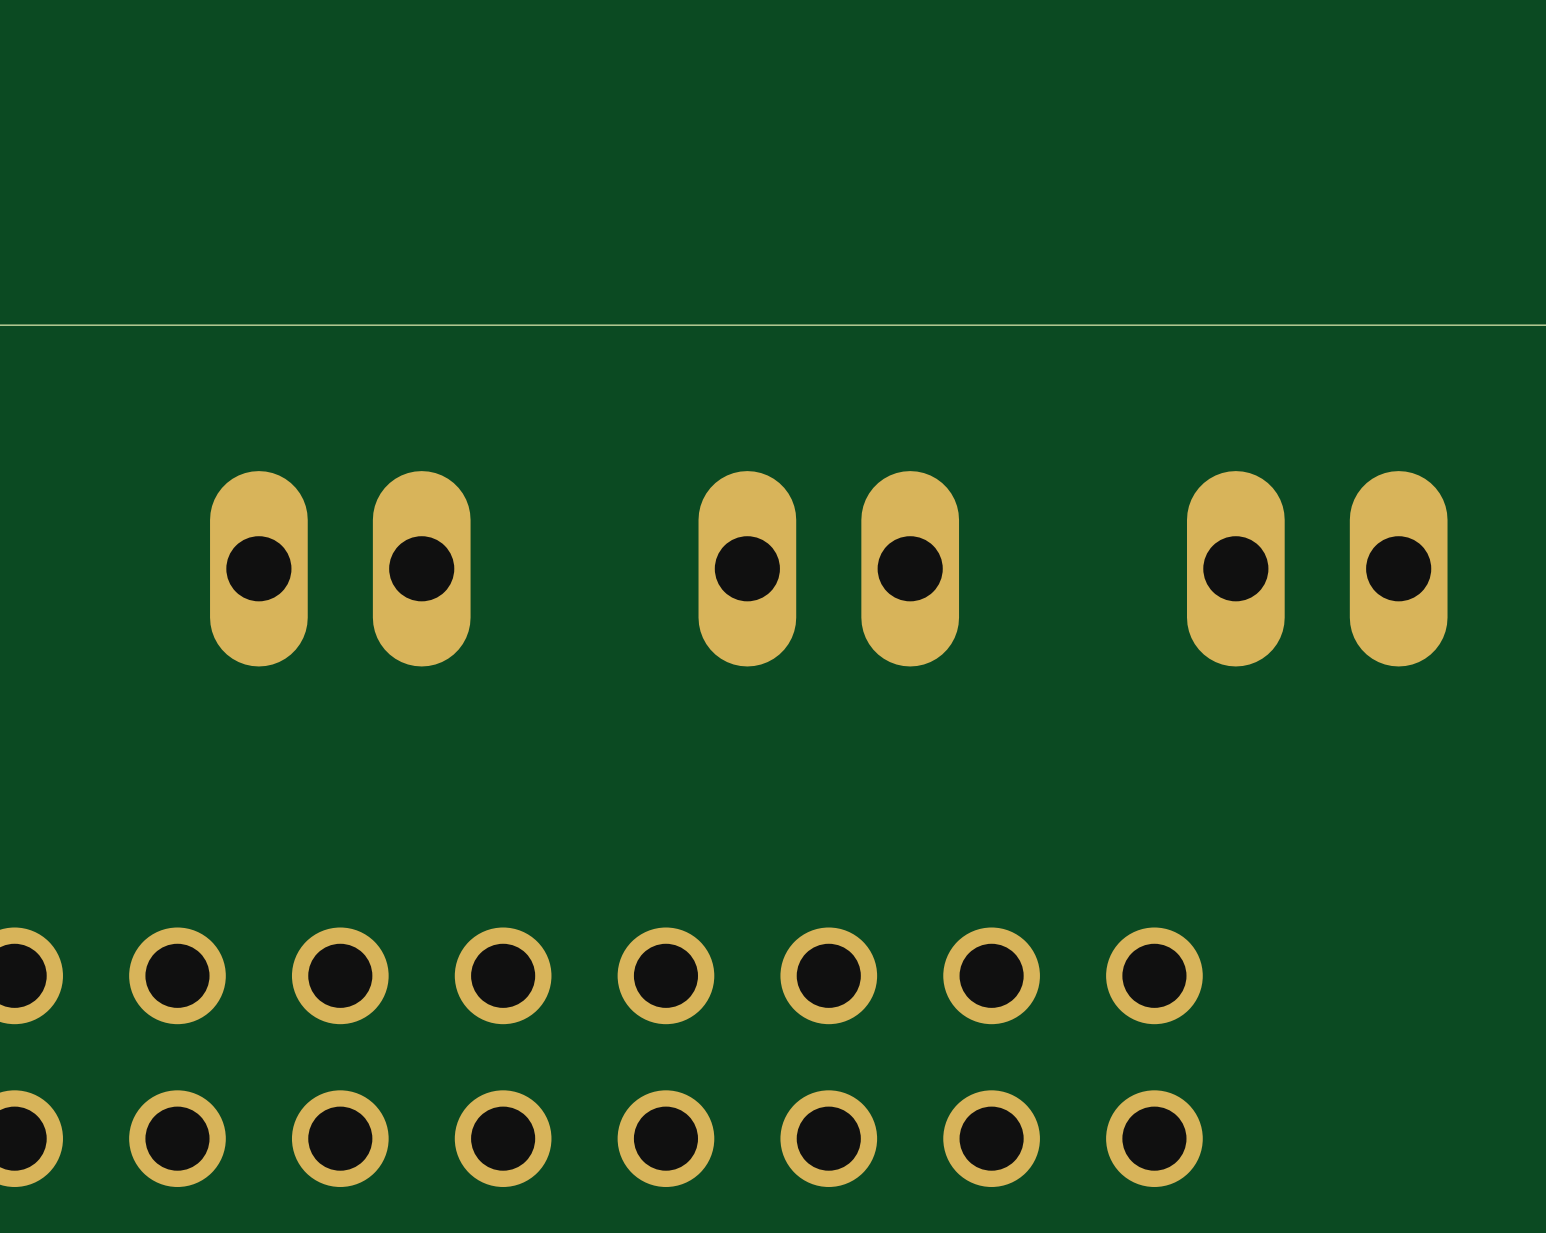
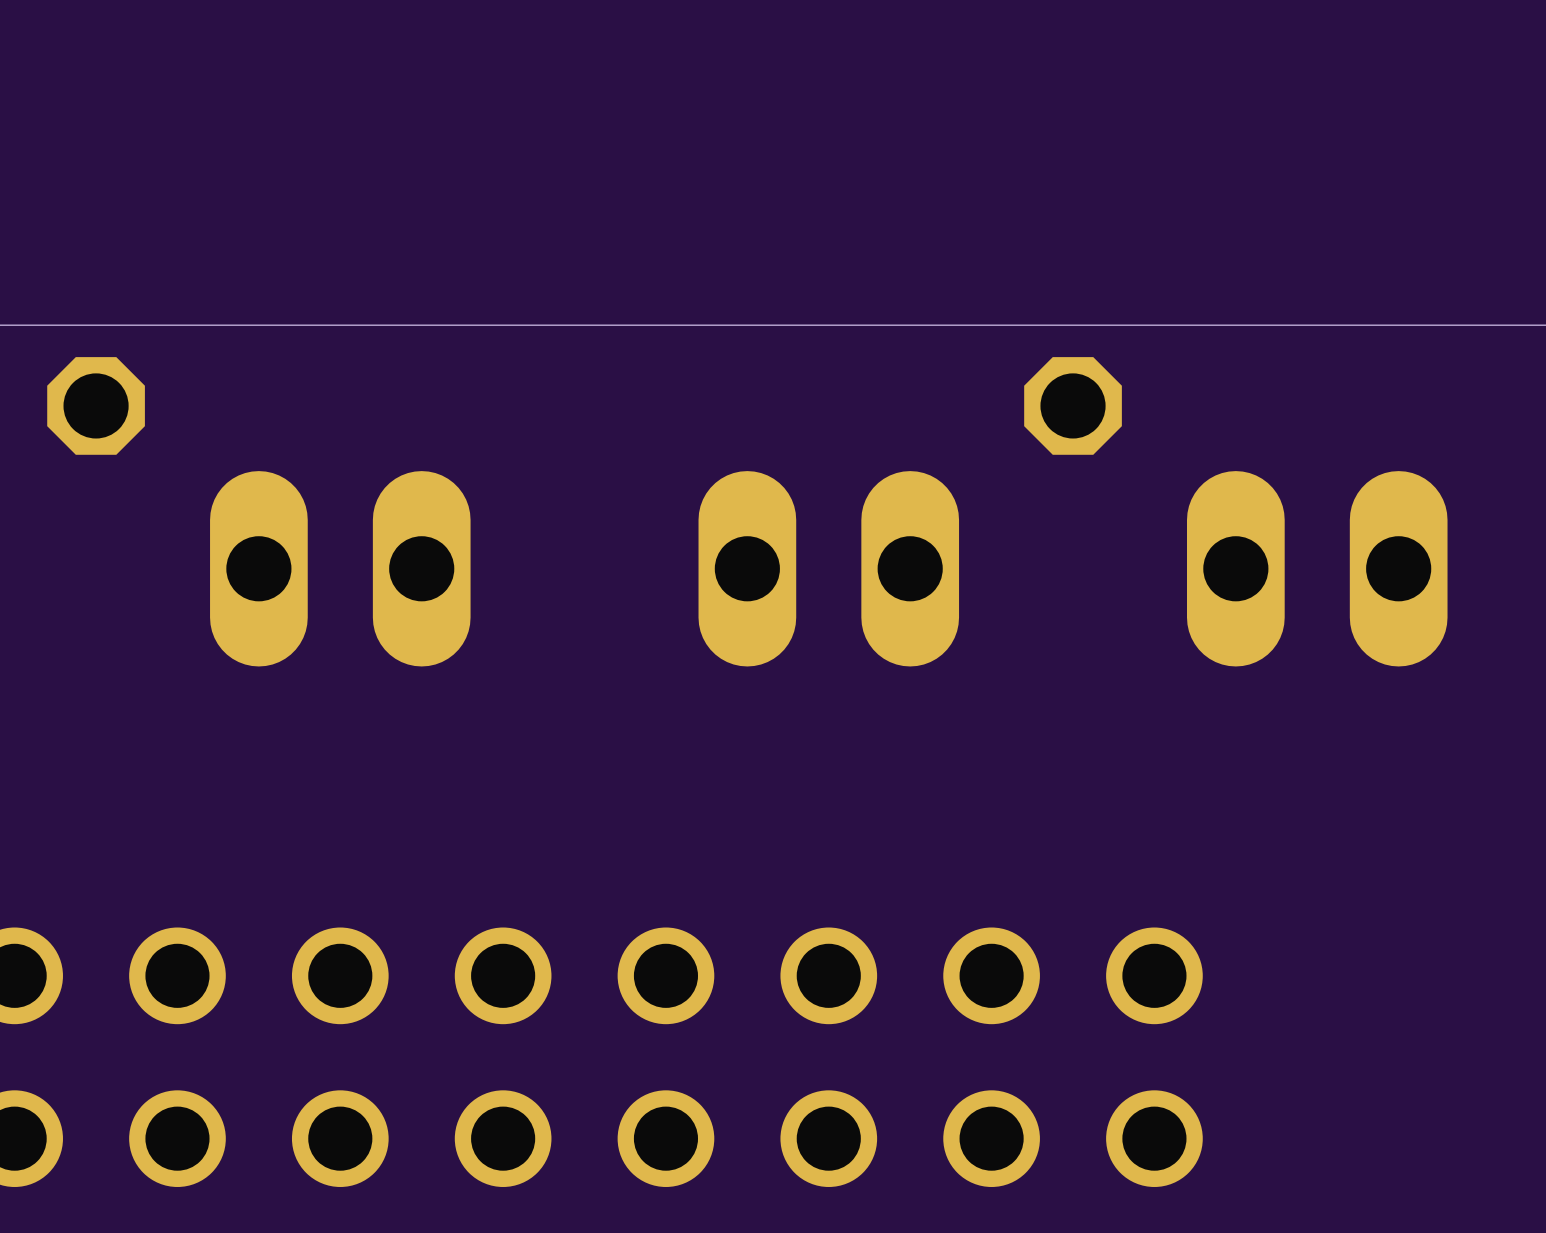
part: none -> (96, 405)
part: none -> (1073, 405)

